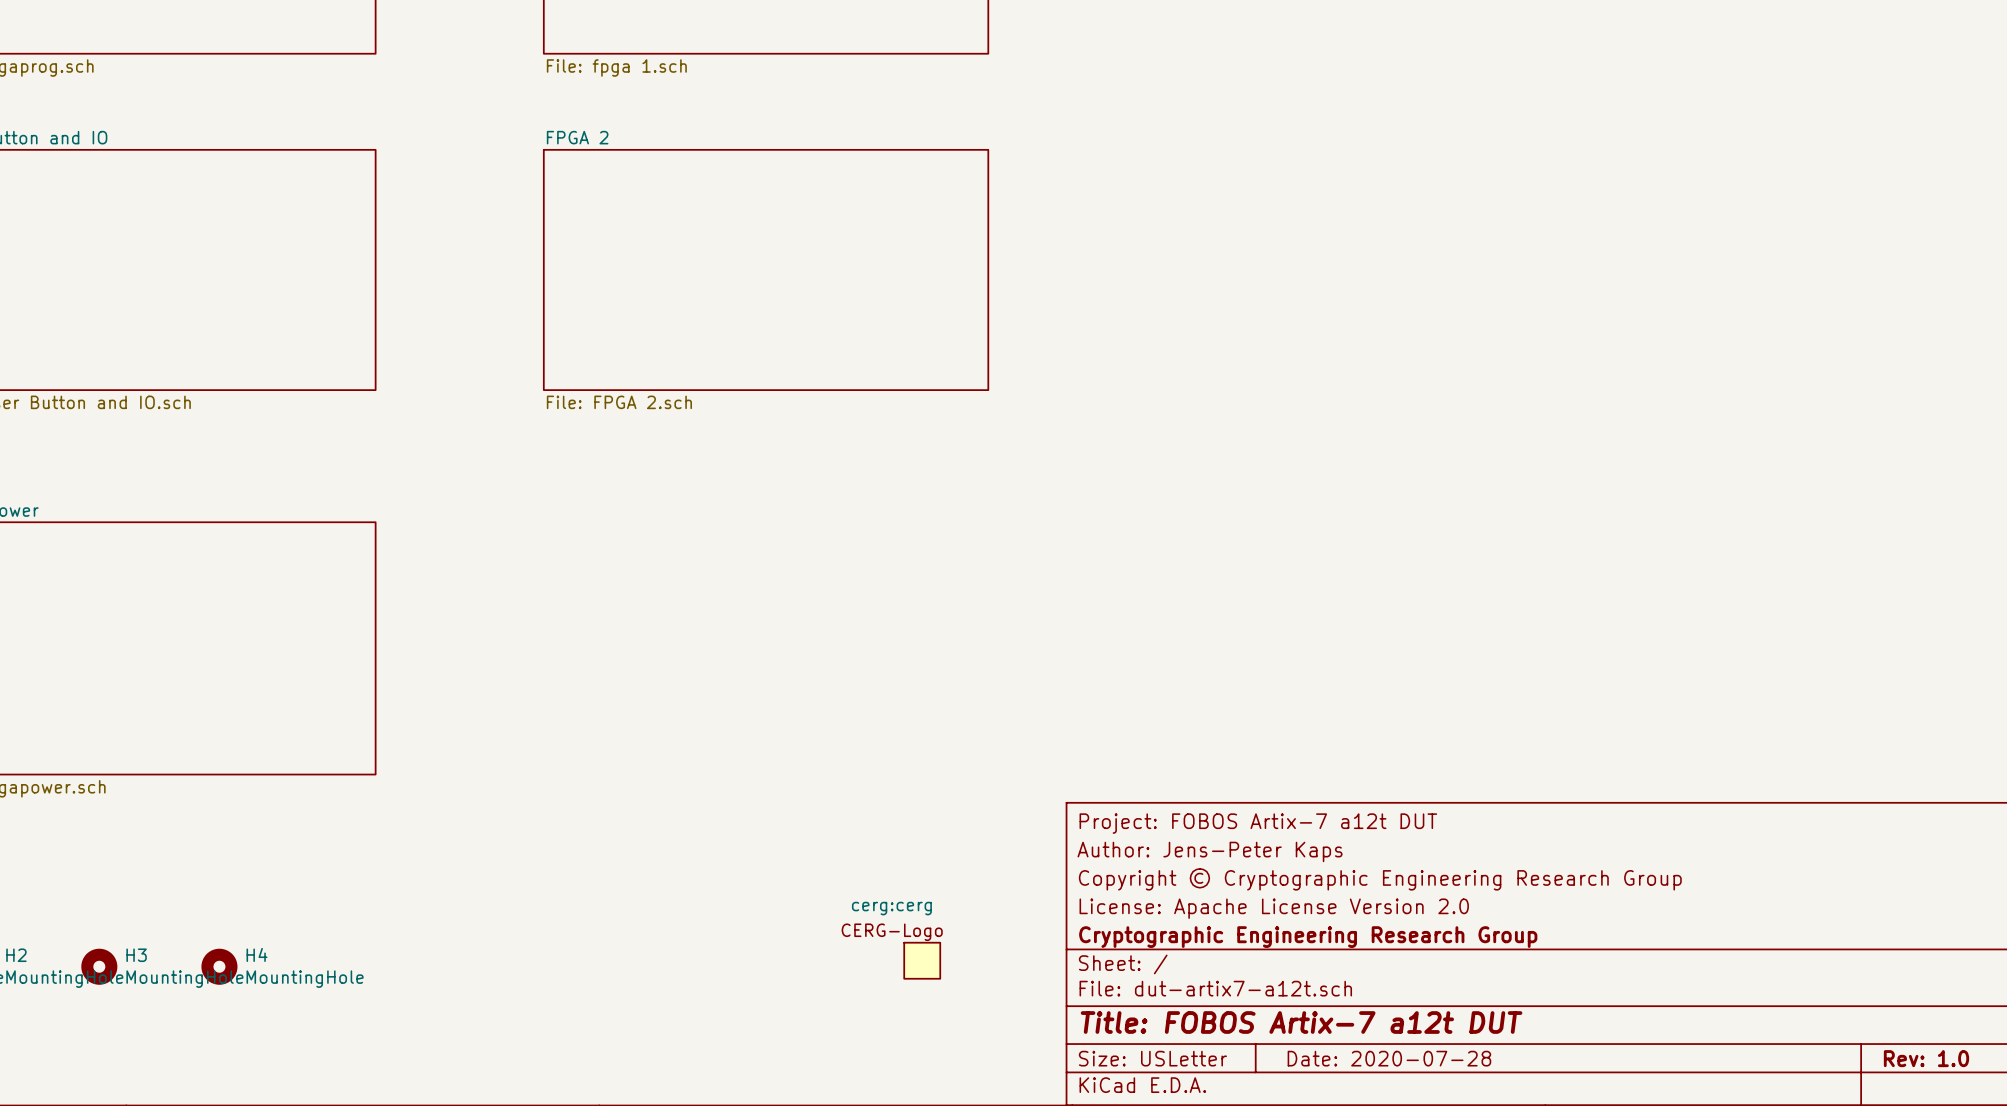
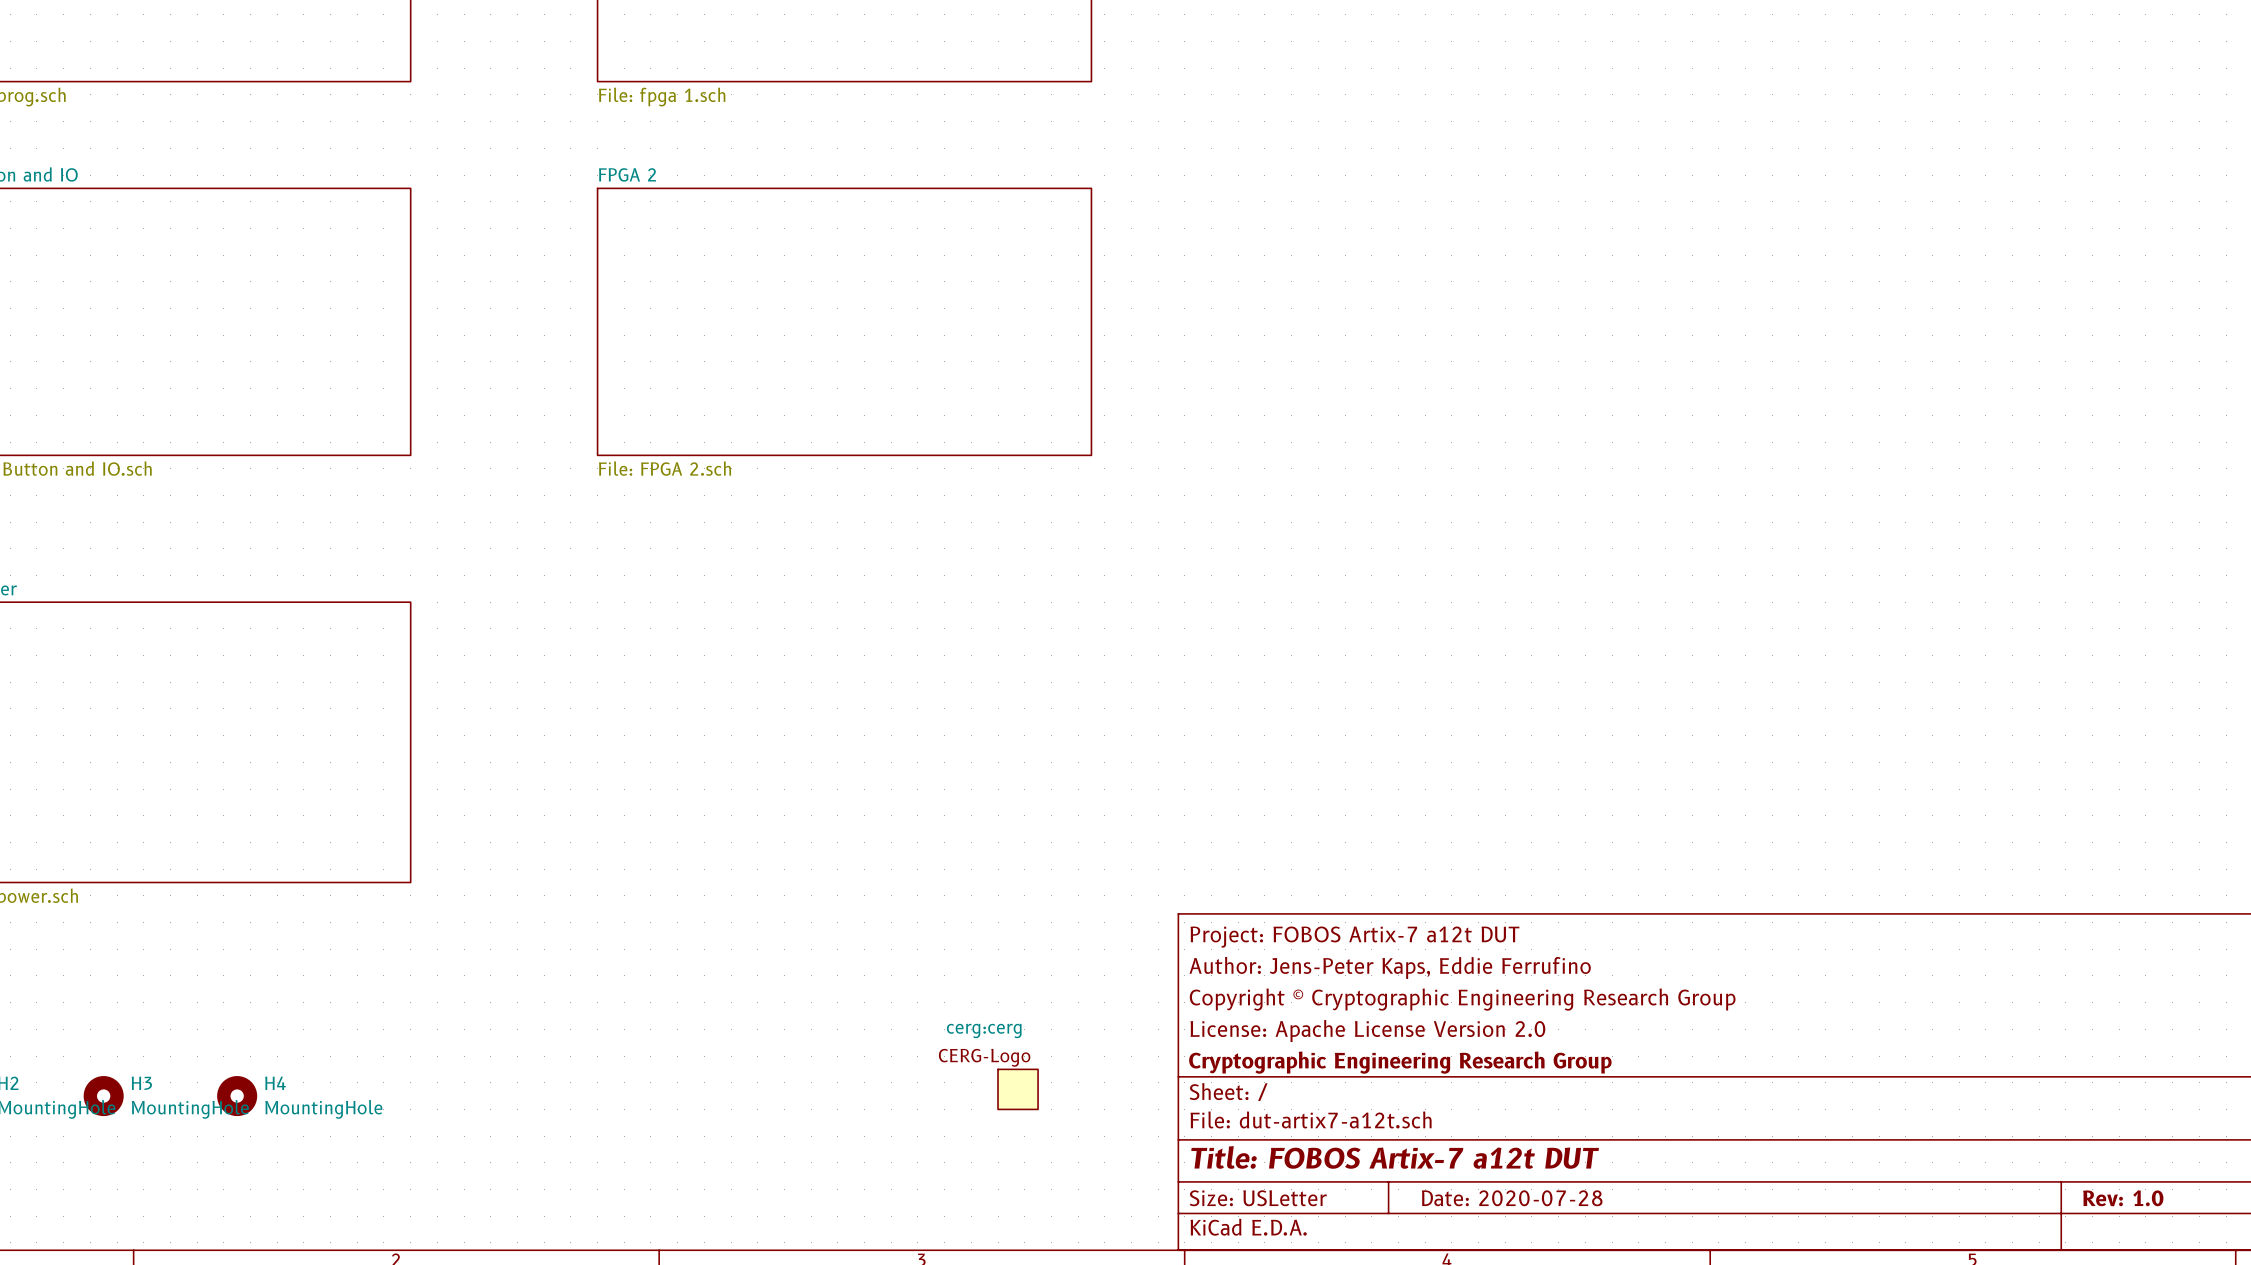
title block: Author: Jens-Peter Kaps (1210, 851) -> Author: Jens-Peter Kaps, Eddie Ferrufino (1390, 967)

